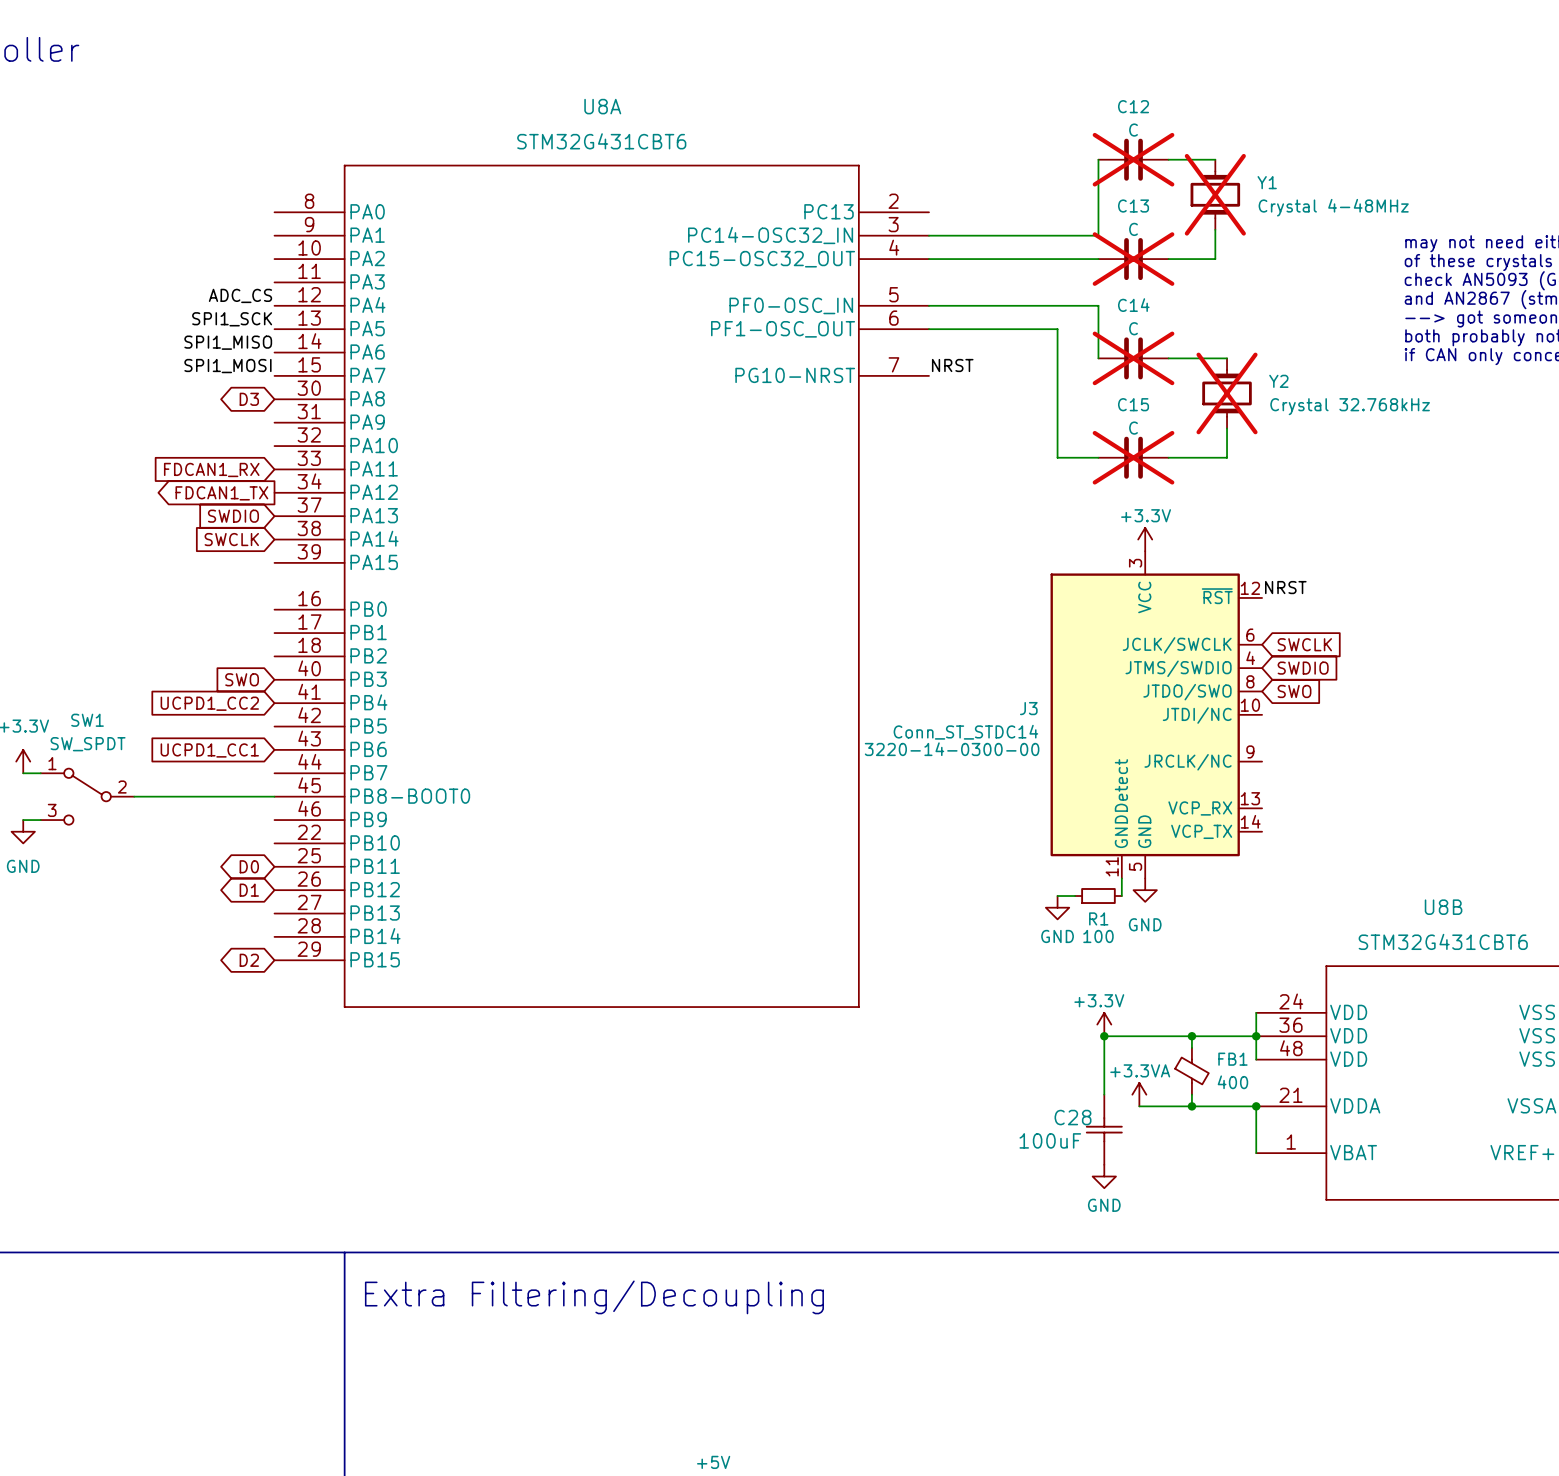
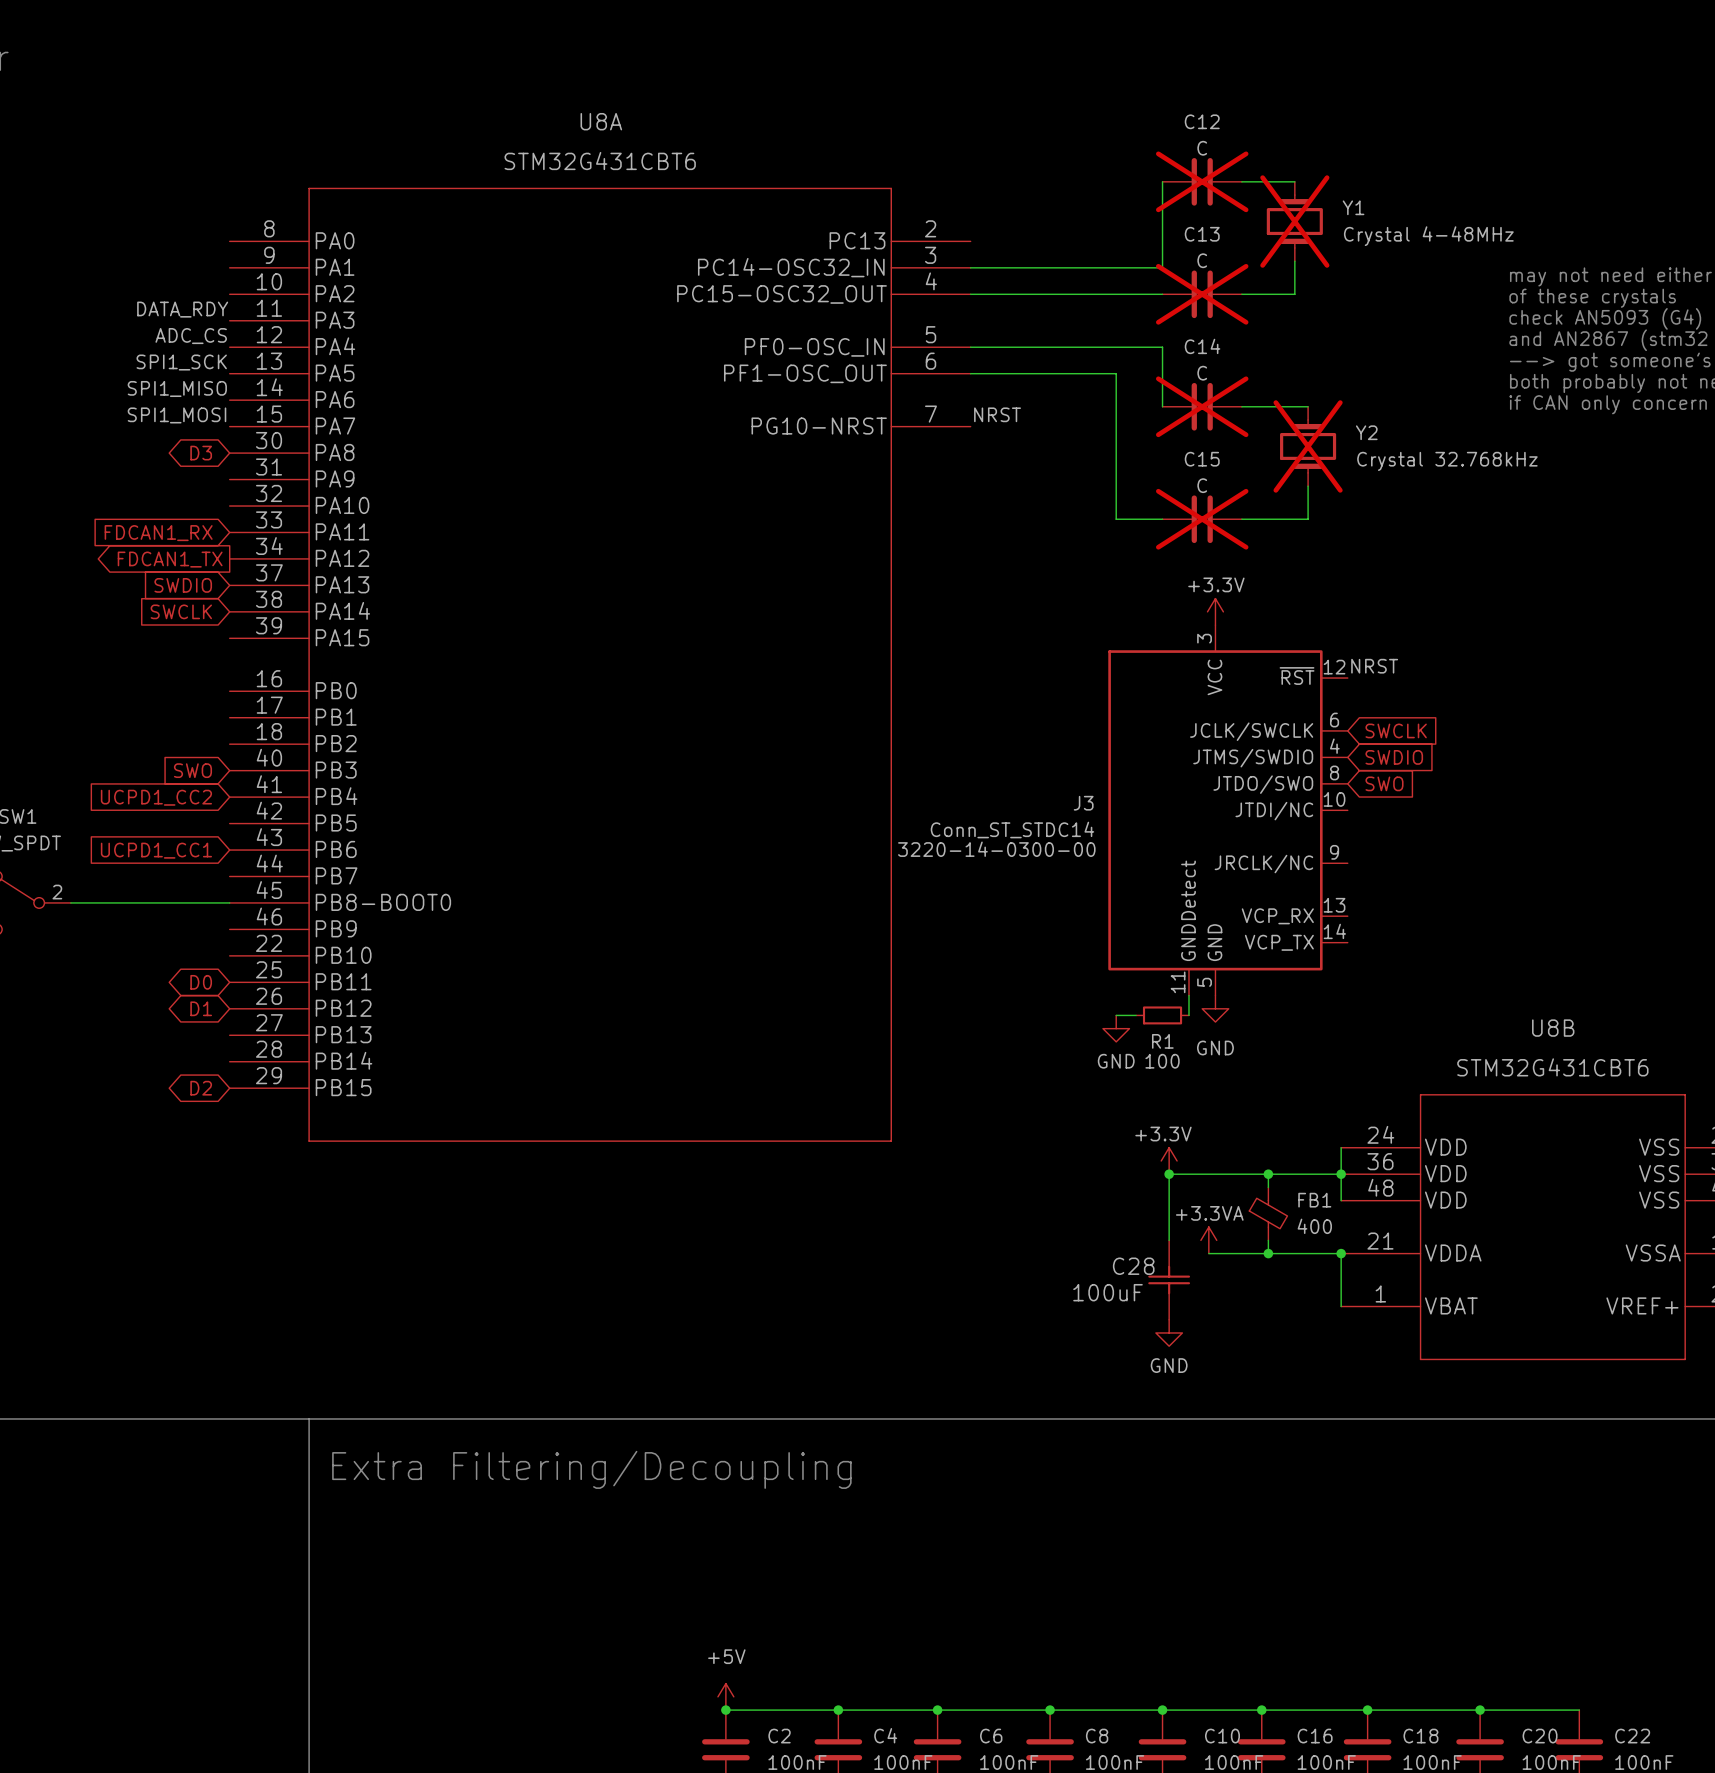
label: none -> DATA_RDY (182, 309)

